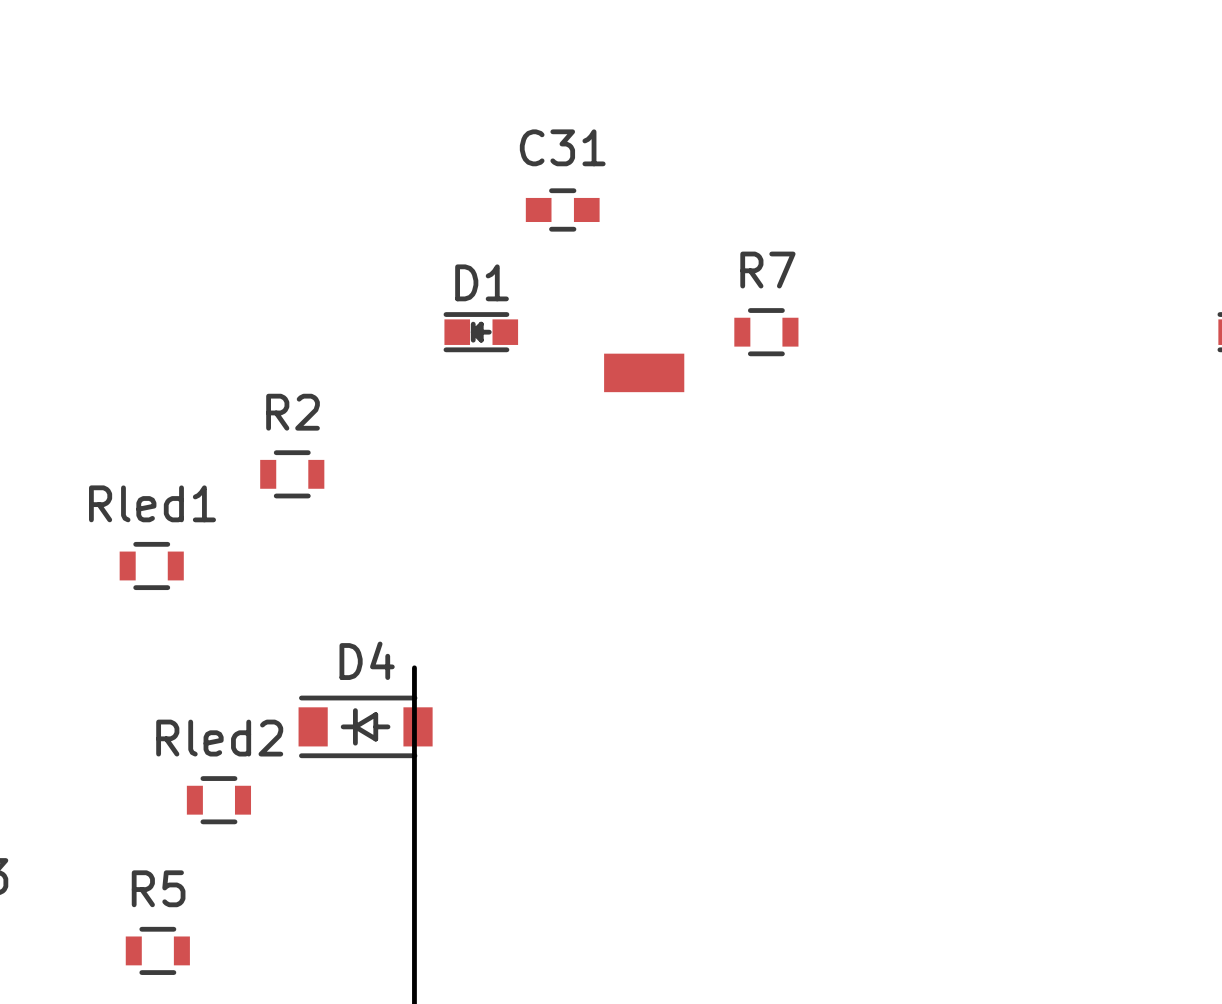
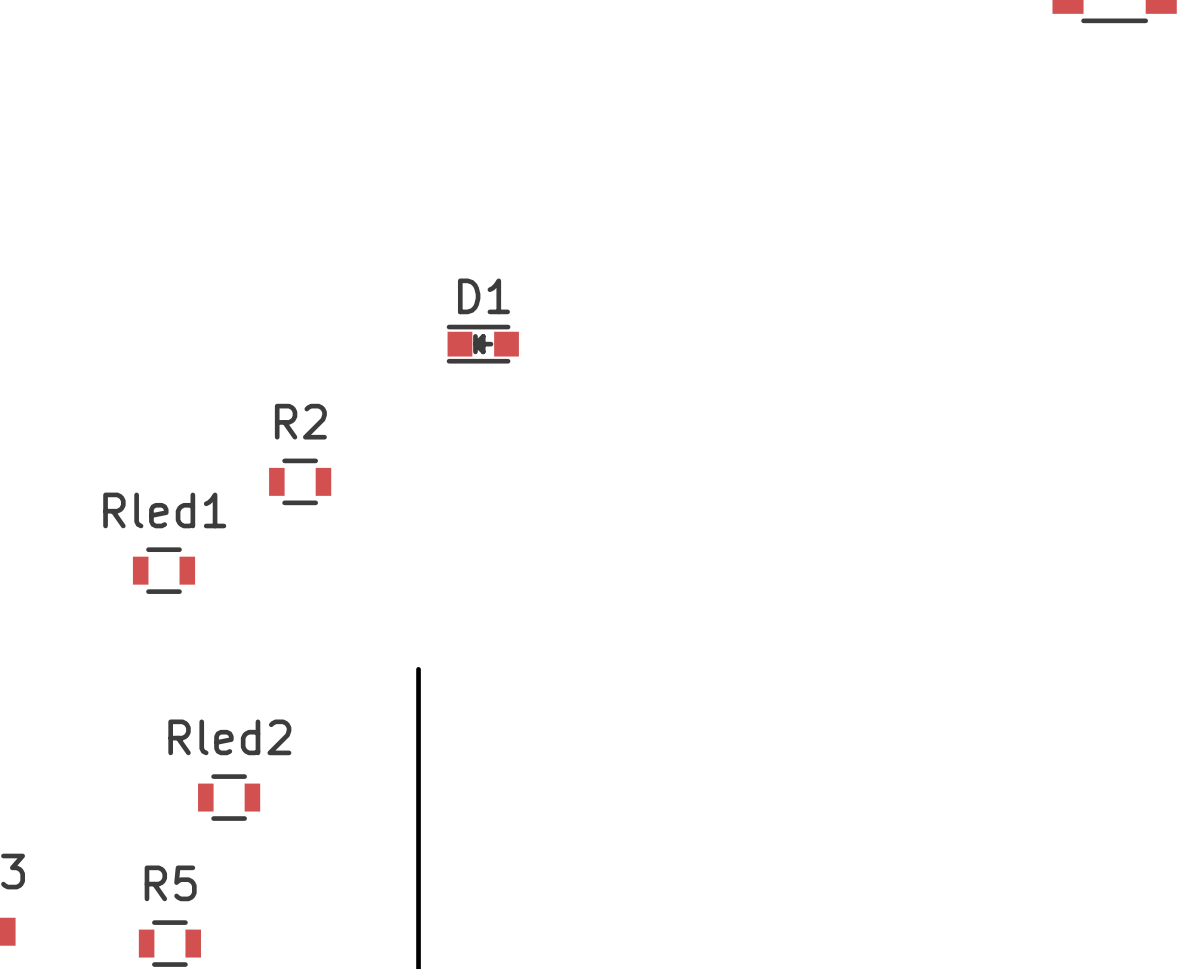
C31: (562, 209) -> none
R7: (766, 332) -> none
part: (644, 372) -> none
D4: (365, 726) -> none

